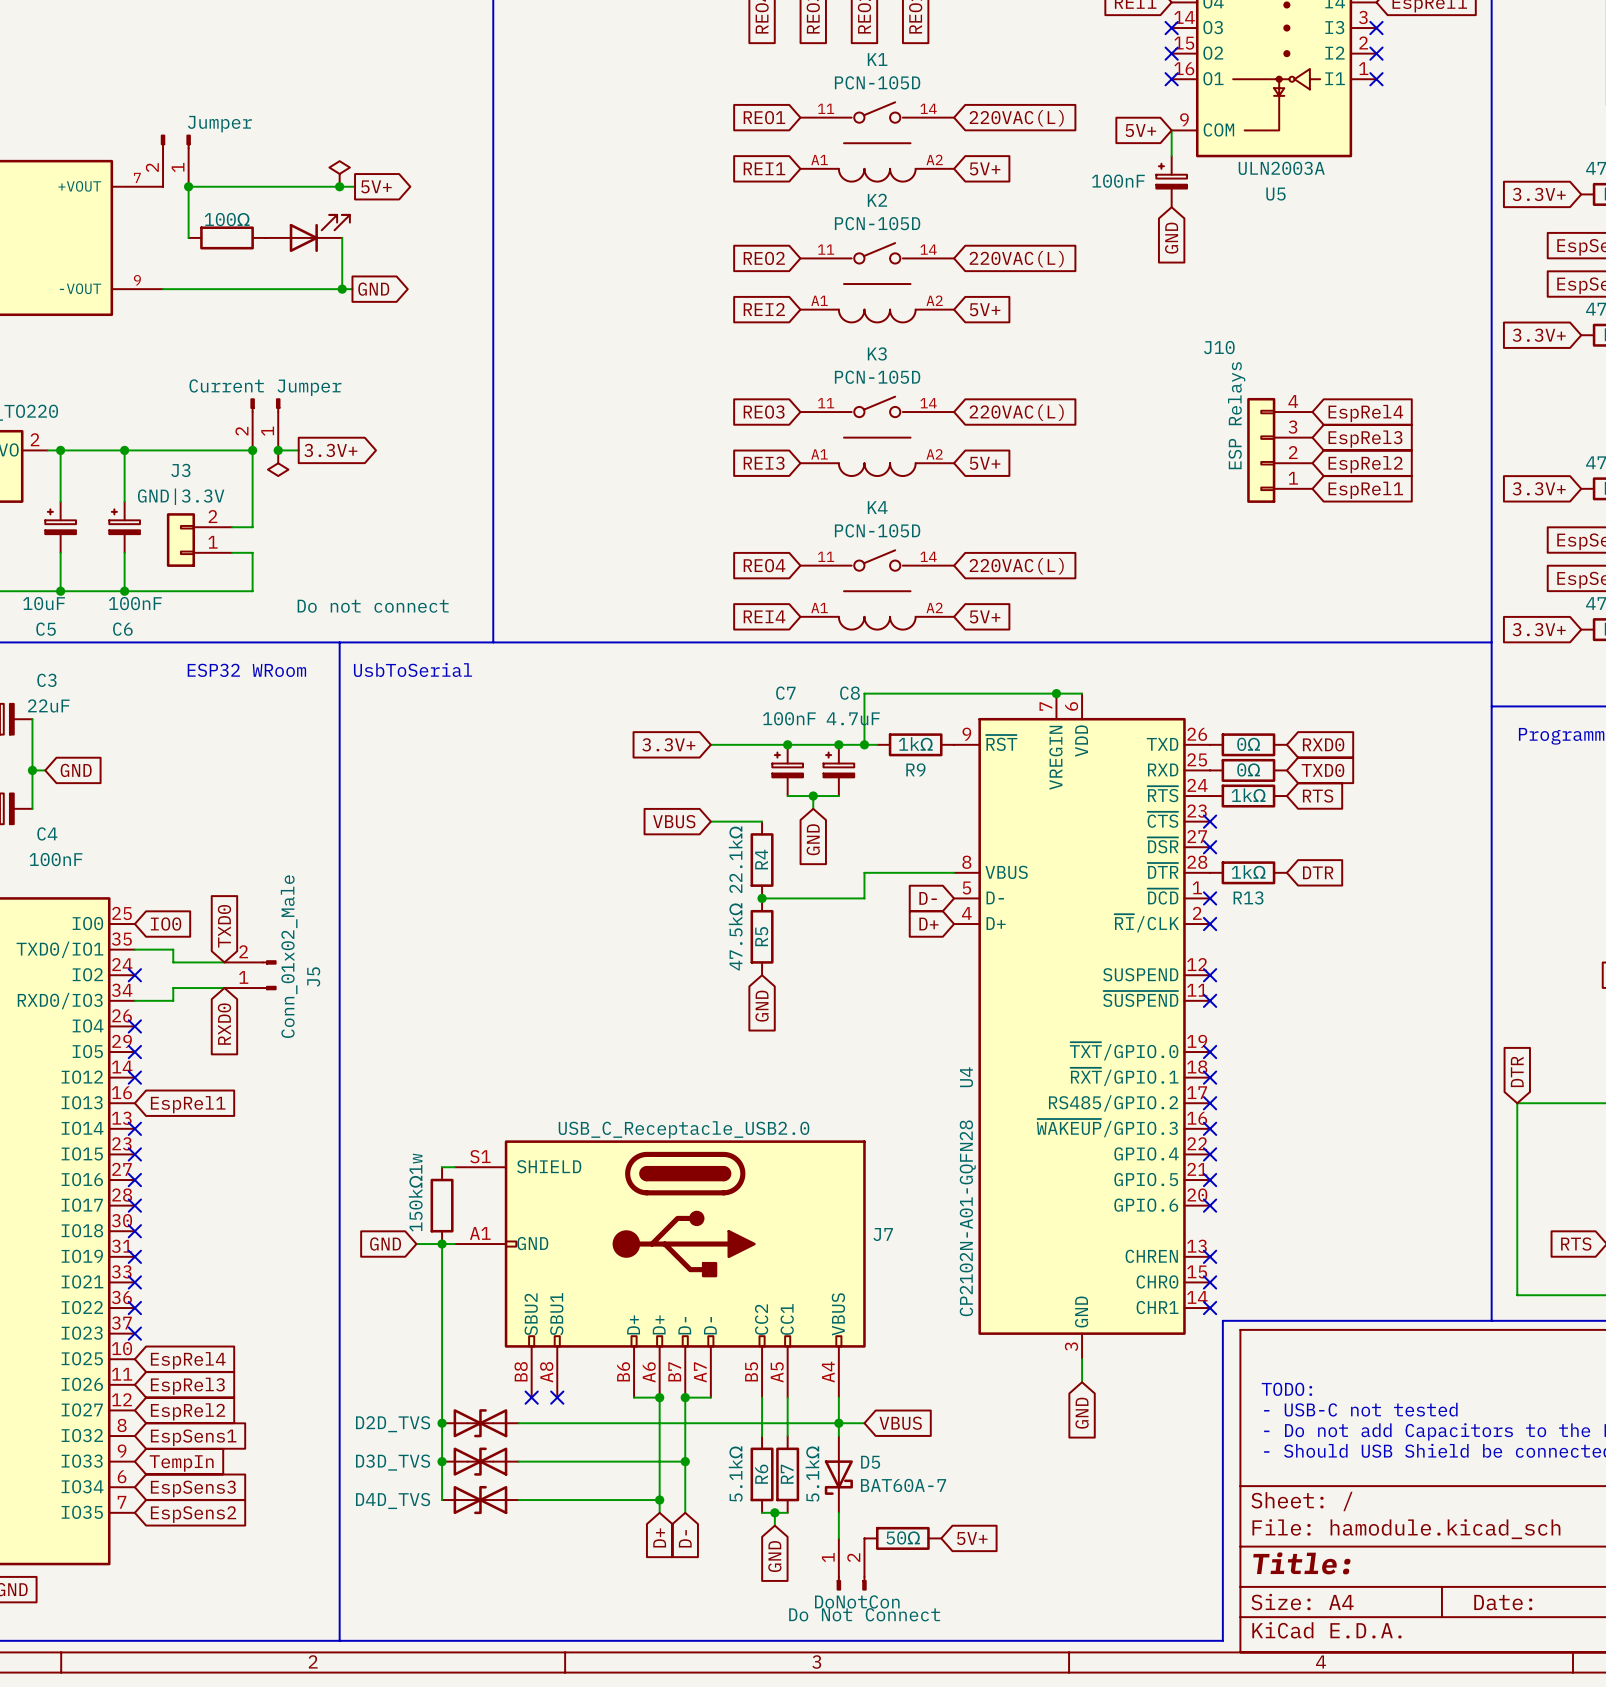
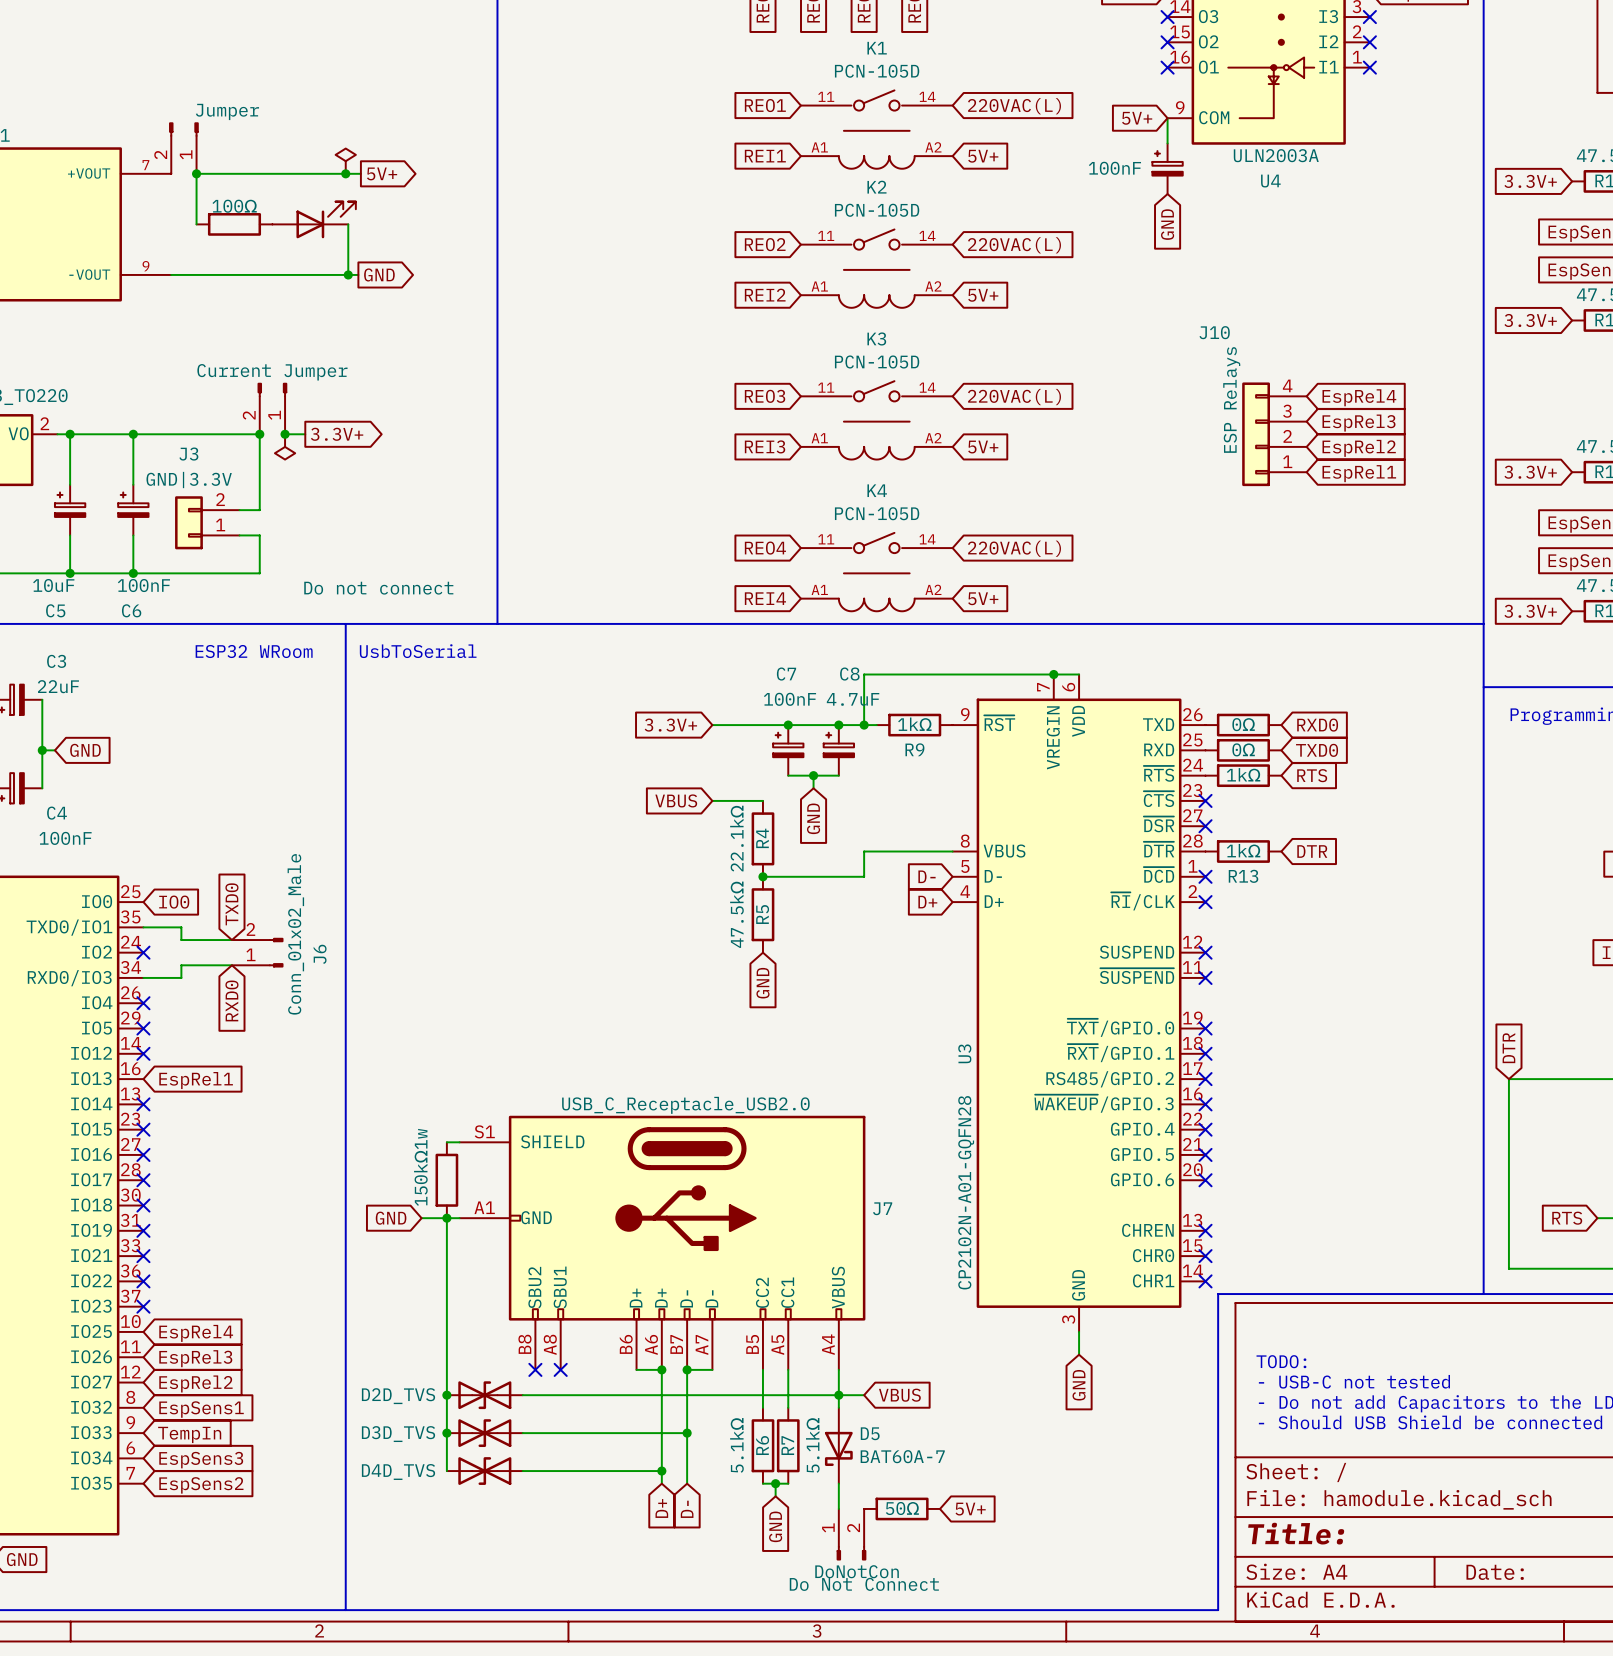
U5 name: U5 (1275, 194) -> U4 (1270, 181)
J5 name: J5 (313, 976) -> J6 (320, 954)
U4 name: U4 (966, 1077) -> U3 (964, 1053)

